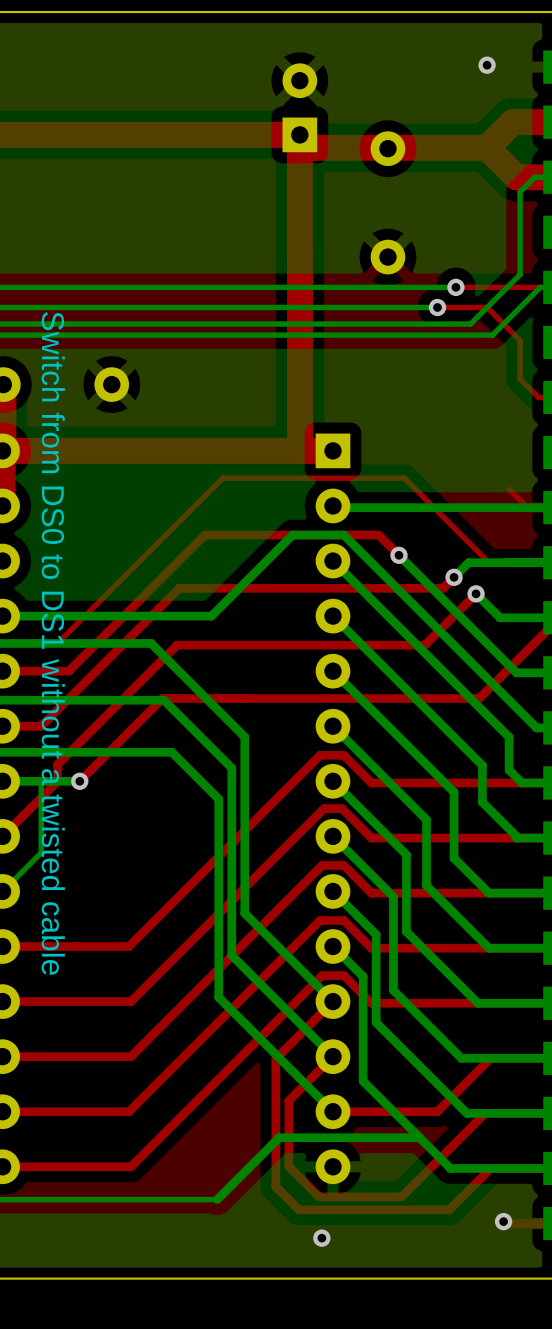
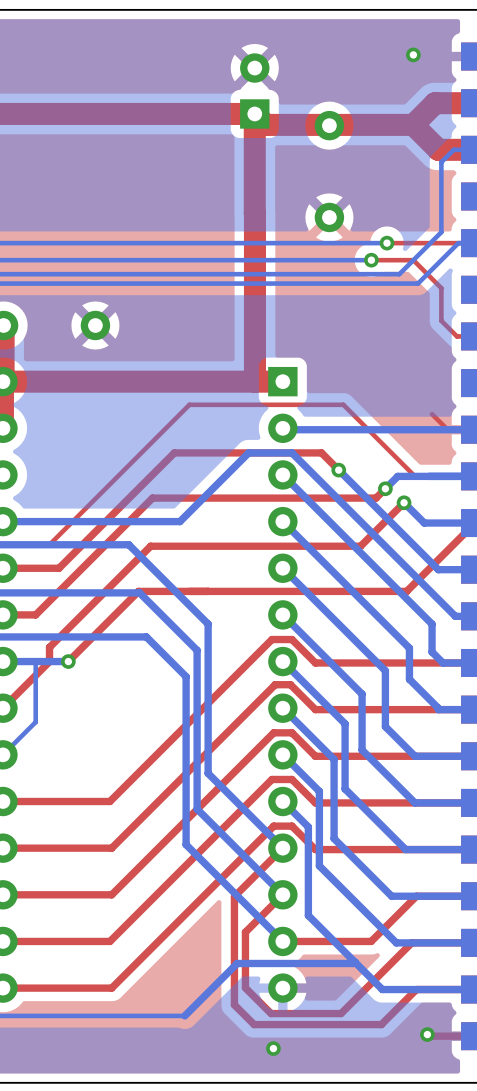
text: Switch from DS0 to DS1 without a twisted cable (53, 643) -> none

